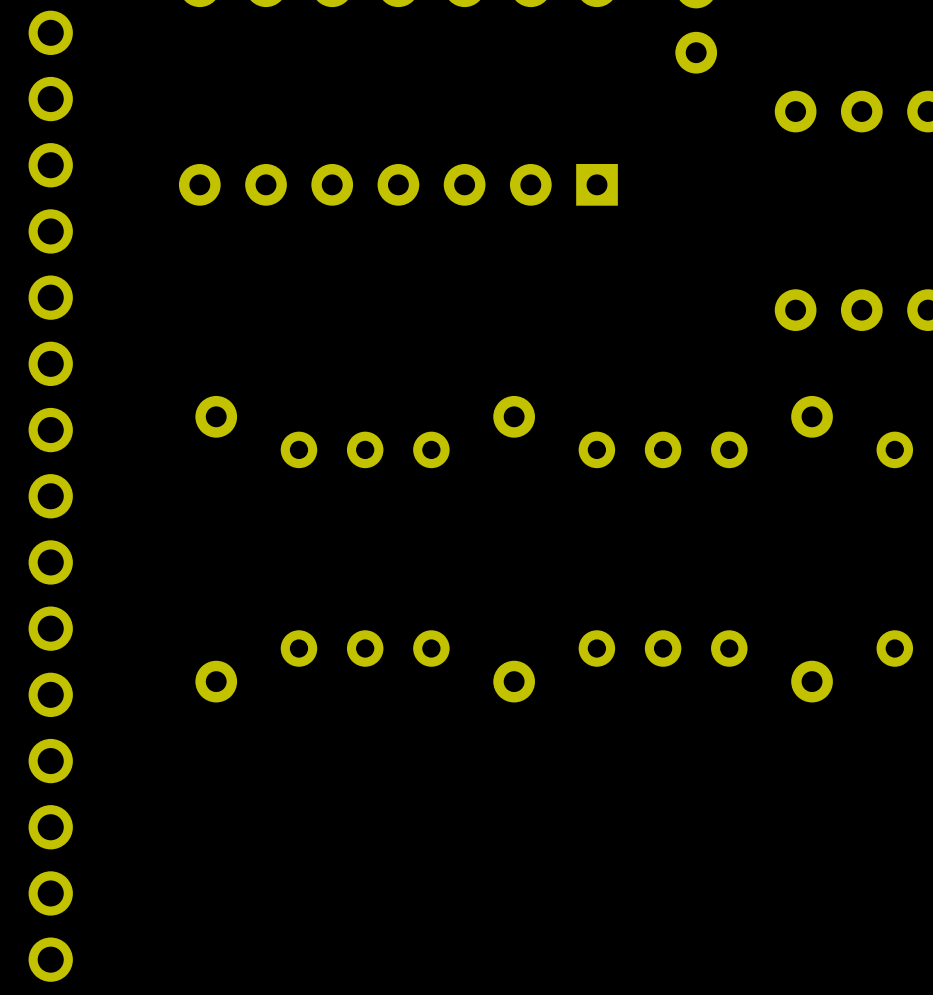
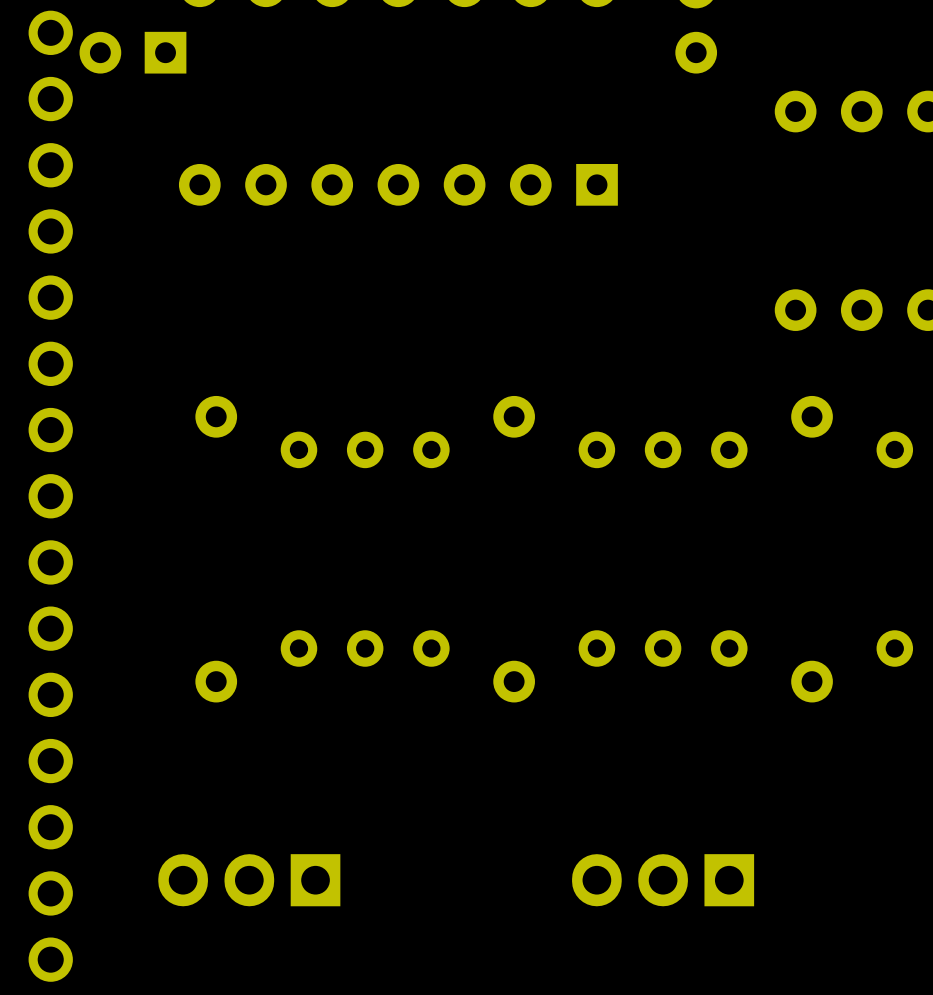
part: none -> (132, 52)
part: none -> (249, 880)
part: none -> (663, 880)

